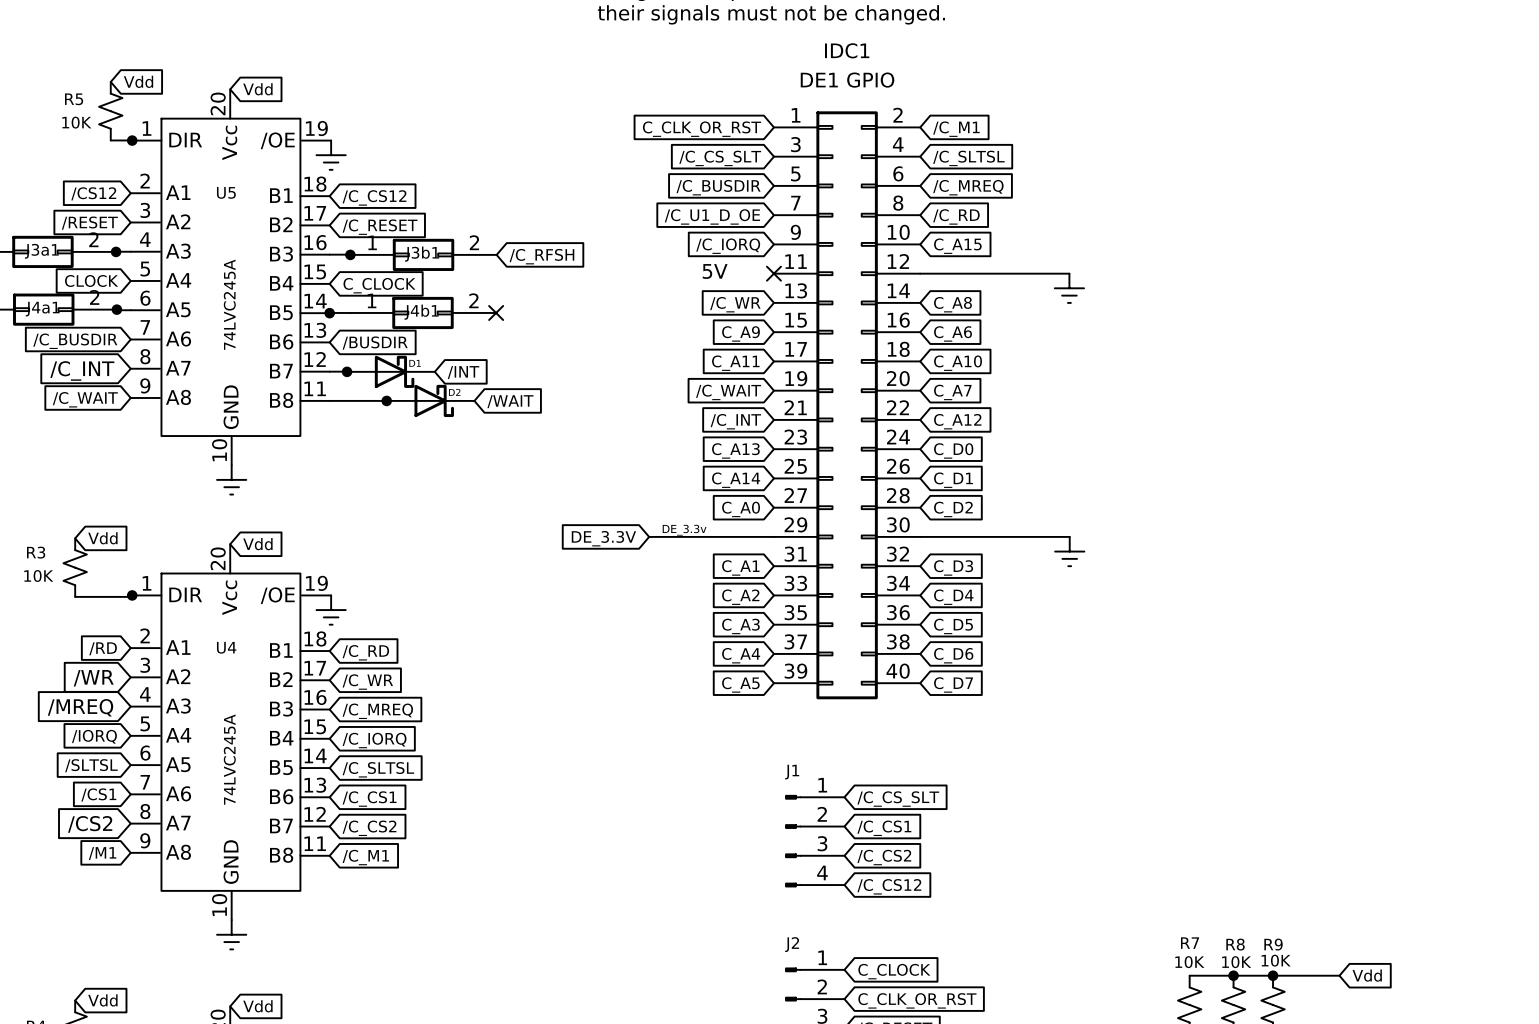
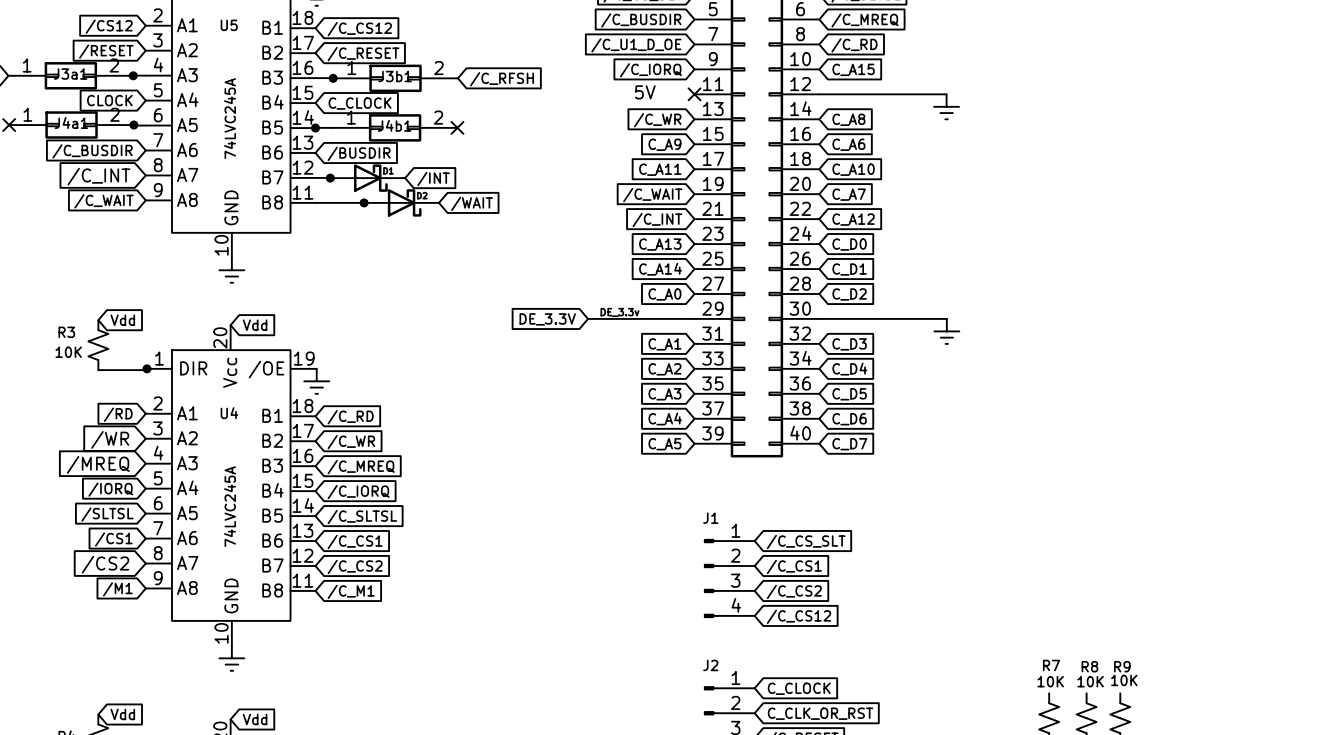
wire: (1189, 975) (1339, 975) -> none
junction: (1233, 975) -> none
junction: (1273, 975) -> none
global label: Vdd (1367, 975) -> none

